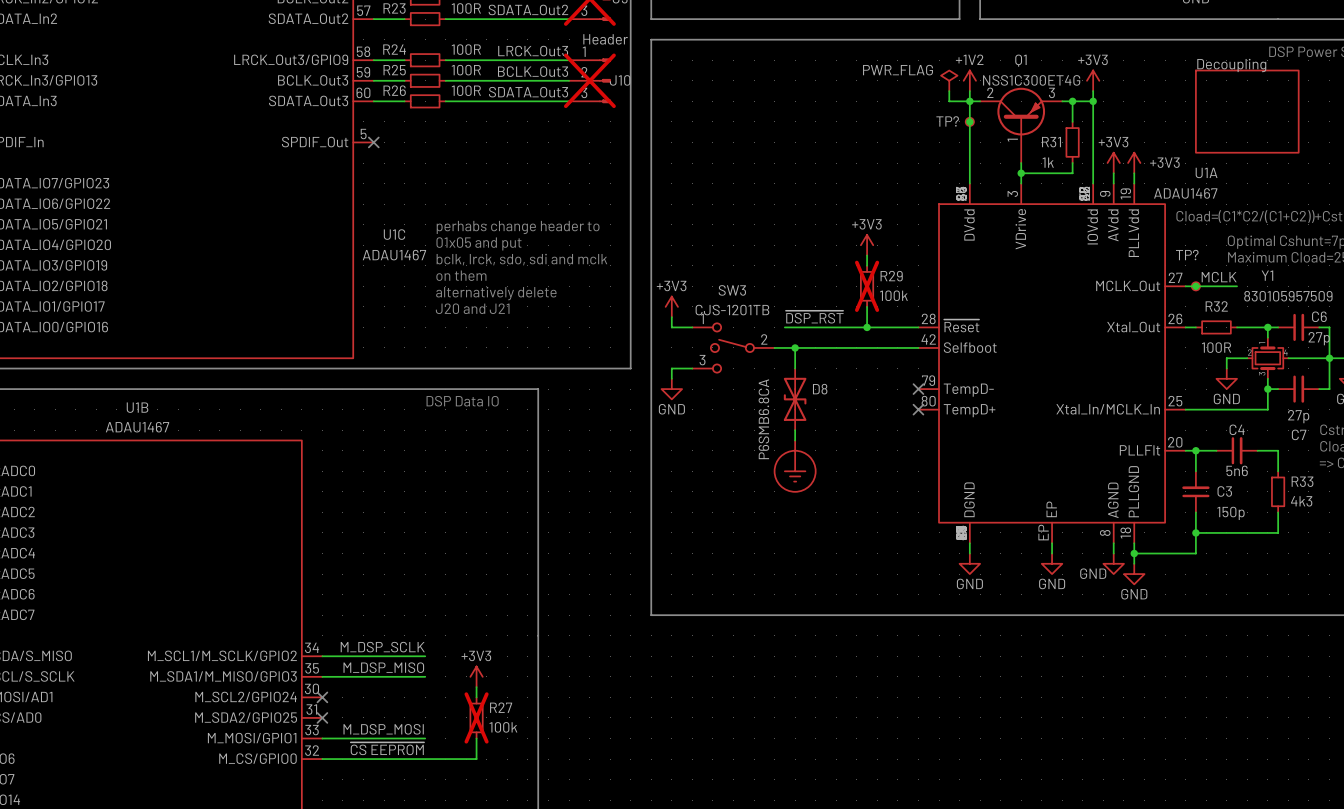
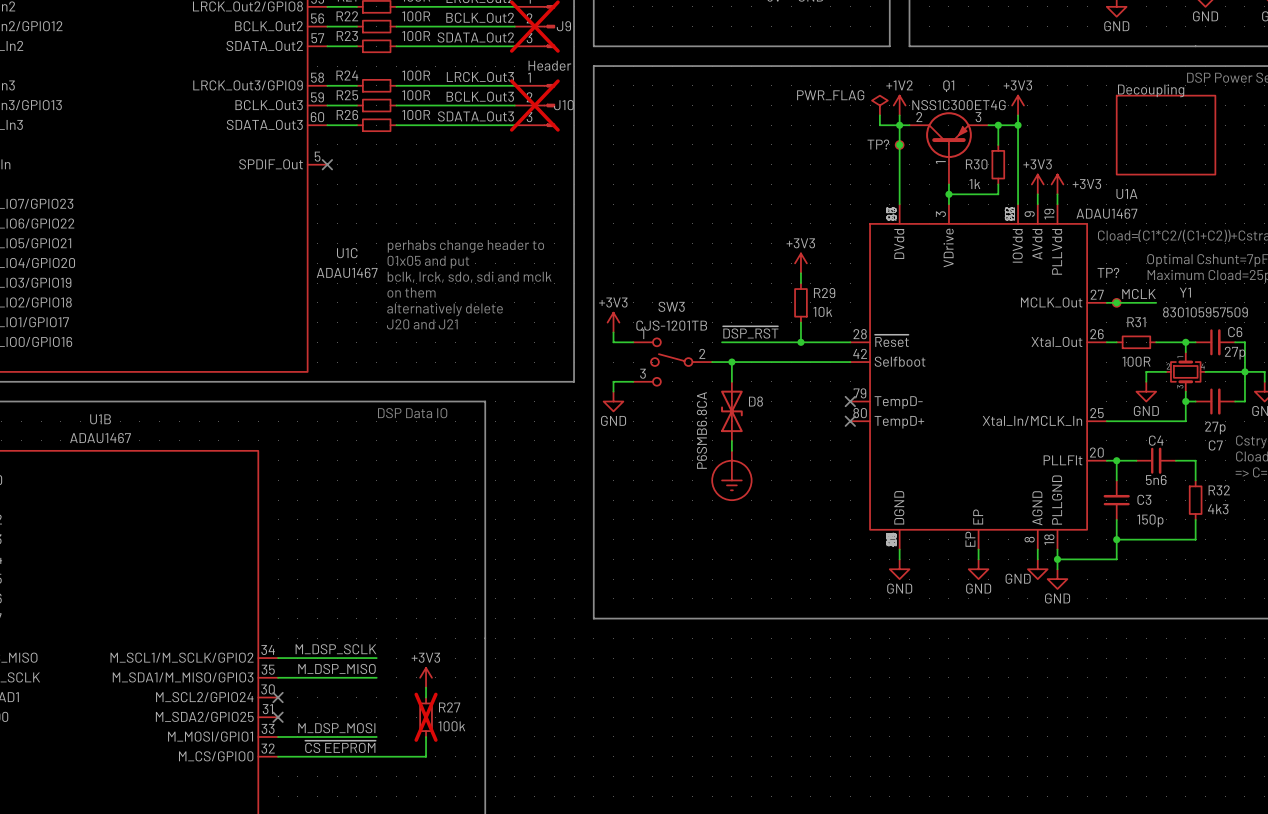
R31 name: R31 (1051, 142) -> R30 (976, 164)
R29 do-not-place cross: (867, 286) -> none
R29 value: 100k (893, 295) -> 10k (822, 311)
R32 name: R32 (1216, 306) -> R31 (1136, 322)
R33 name: R33 (1302, 481) -> R32 (1219, 490)

